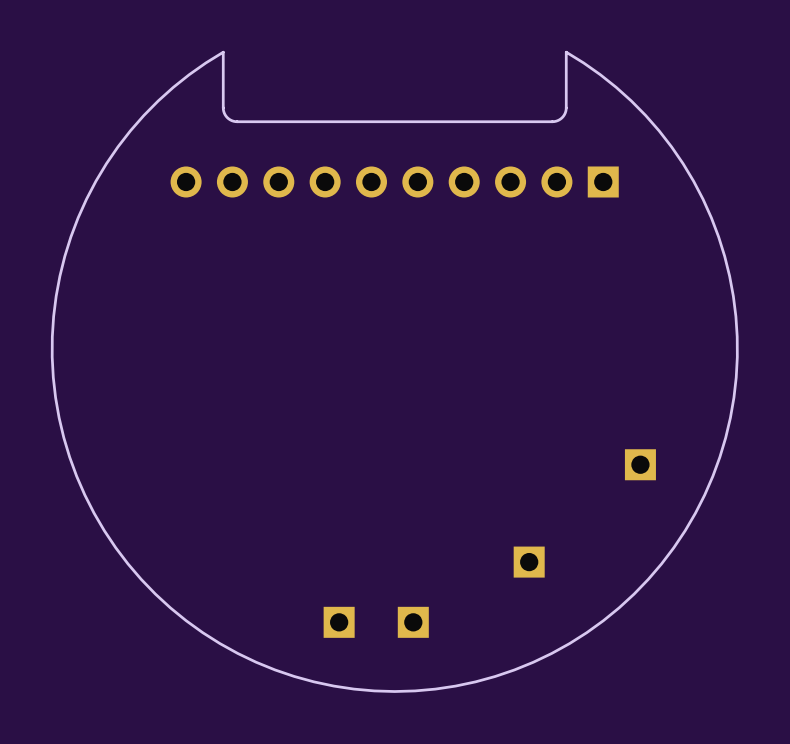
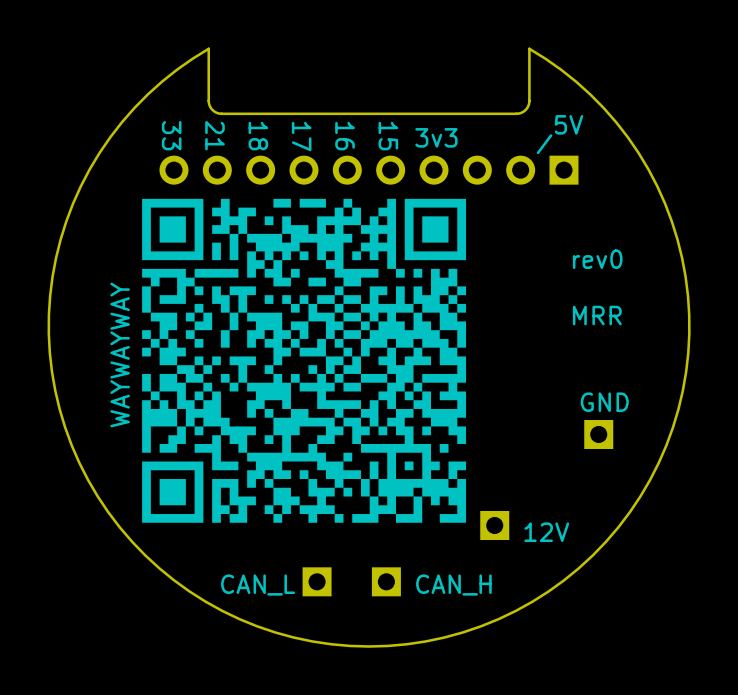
text: none -> 5V (569, 124)
line: none -> (551, 135) (538, 152)
text: none -> 33 (171, 135)
text: none -> 21 (215, 135)
text: none -> 18 (258, 136)
text: none -> 17 (301, 136)
text: none -> 16 (345, 136)
text: none -> 15 (388, 136)
text: none -> 3v3 (436, 137)
drawing: none -> [142, 198, 467, 523]
text: none -> rev0 (597, 259)
text: none -> MRR (597, 315)
text: none -> WAYWAYWAY (120, 354)
text: none -> GND (604, 402)
text: none -> 12V (546, 532)
text: none -> CAN_L (258, 585)
text: none -> CAN_H (453, 585)

